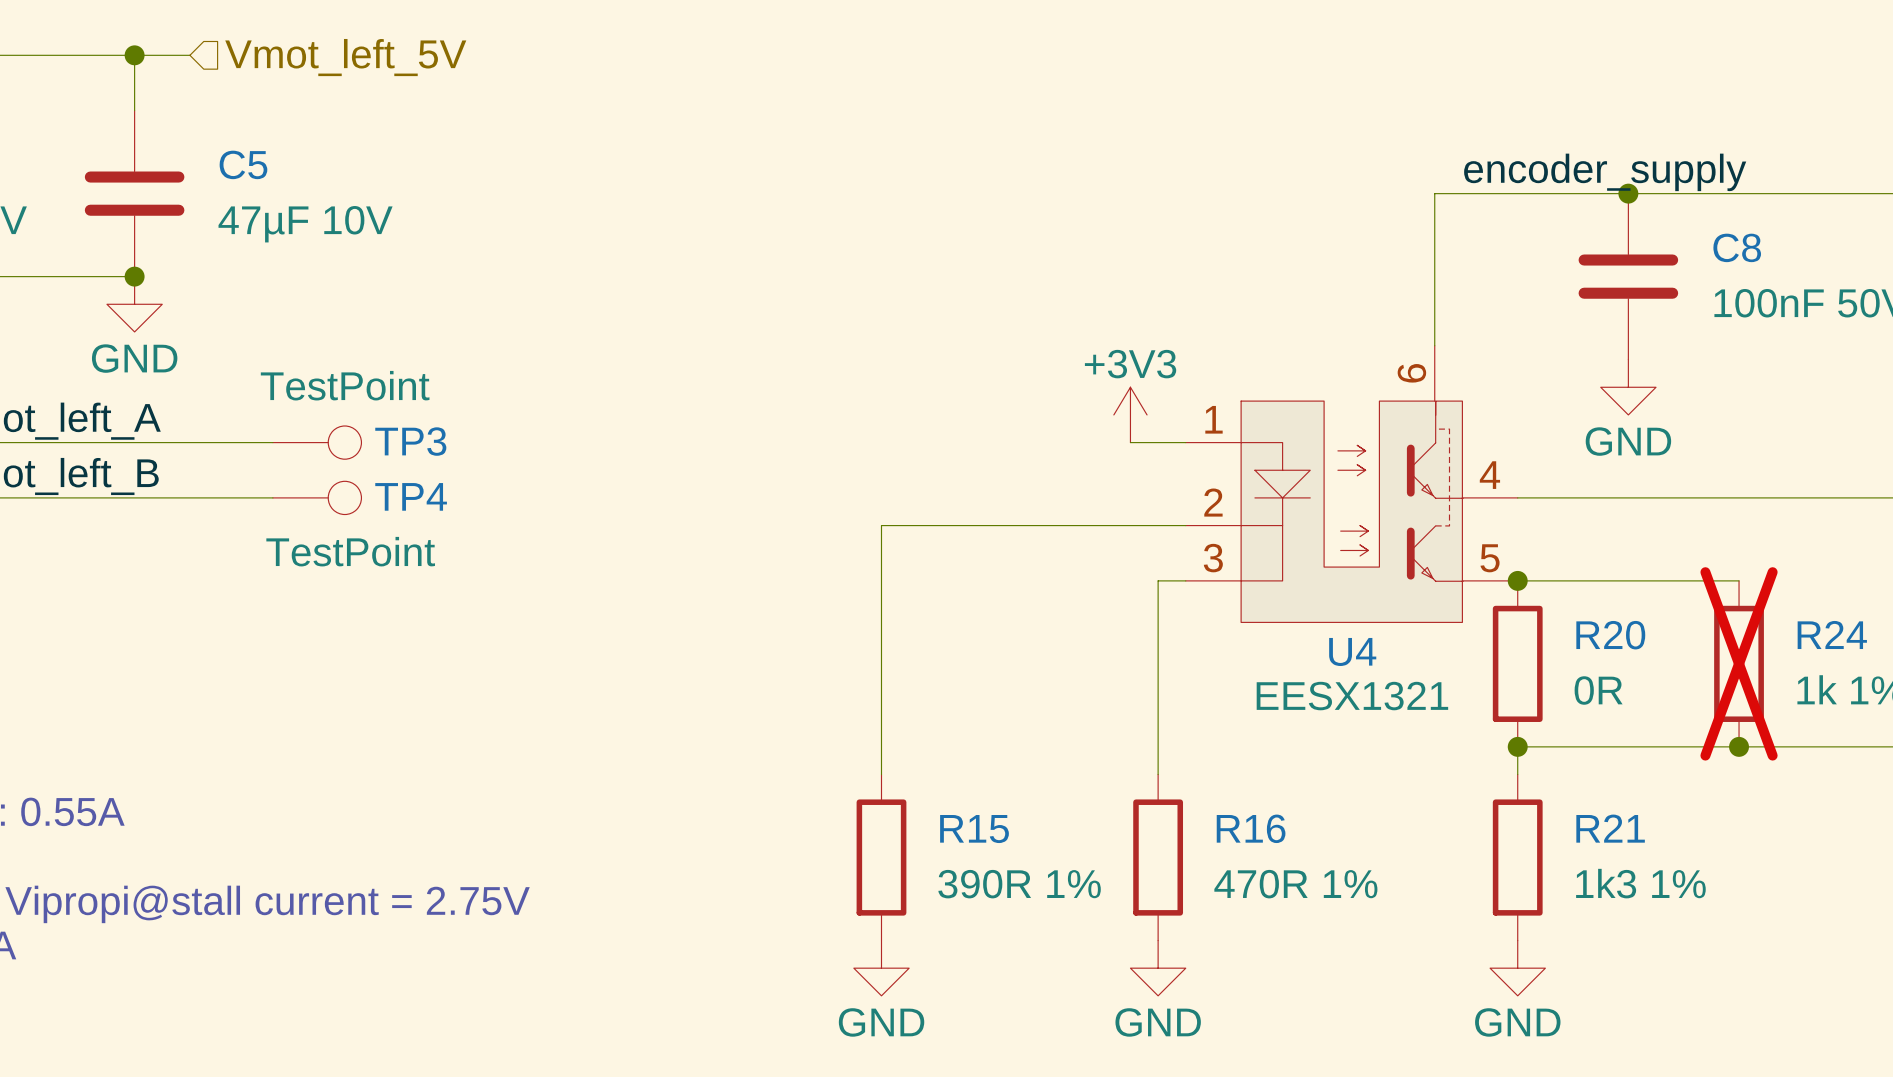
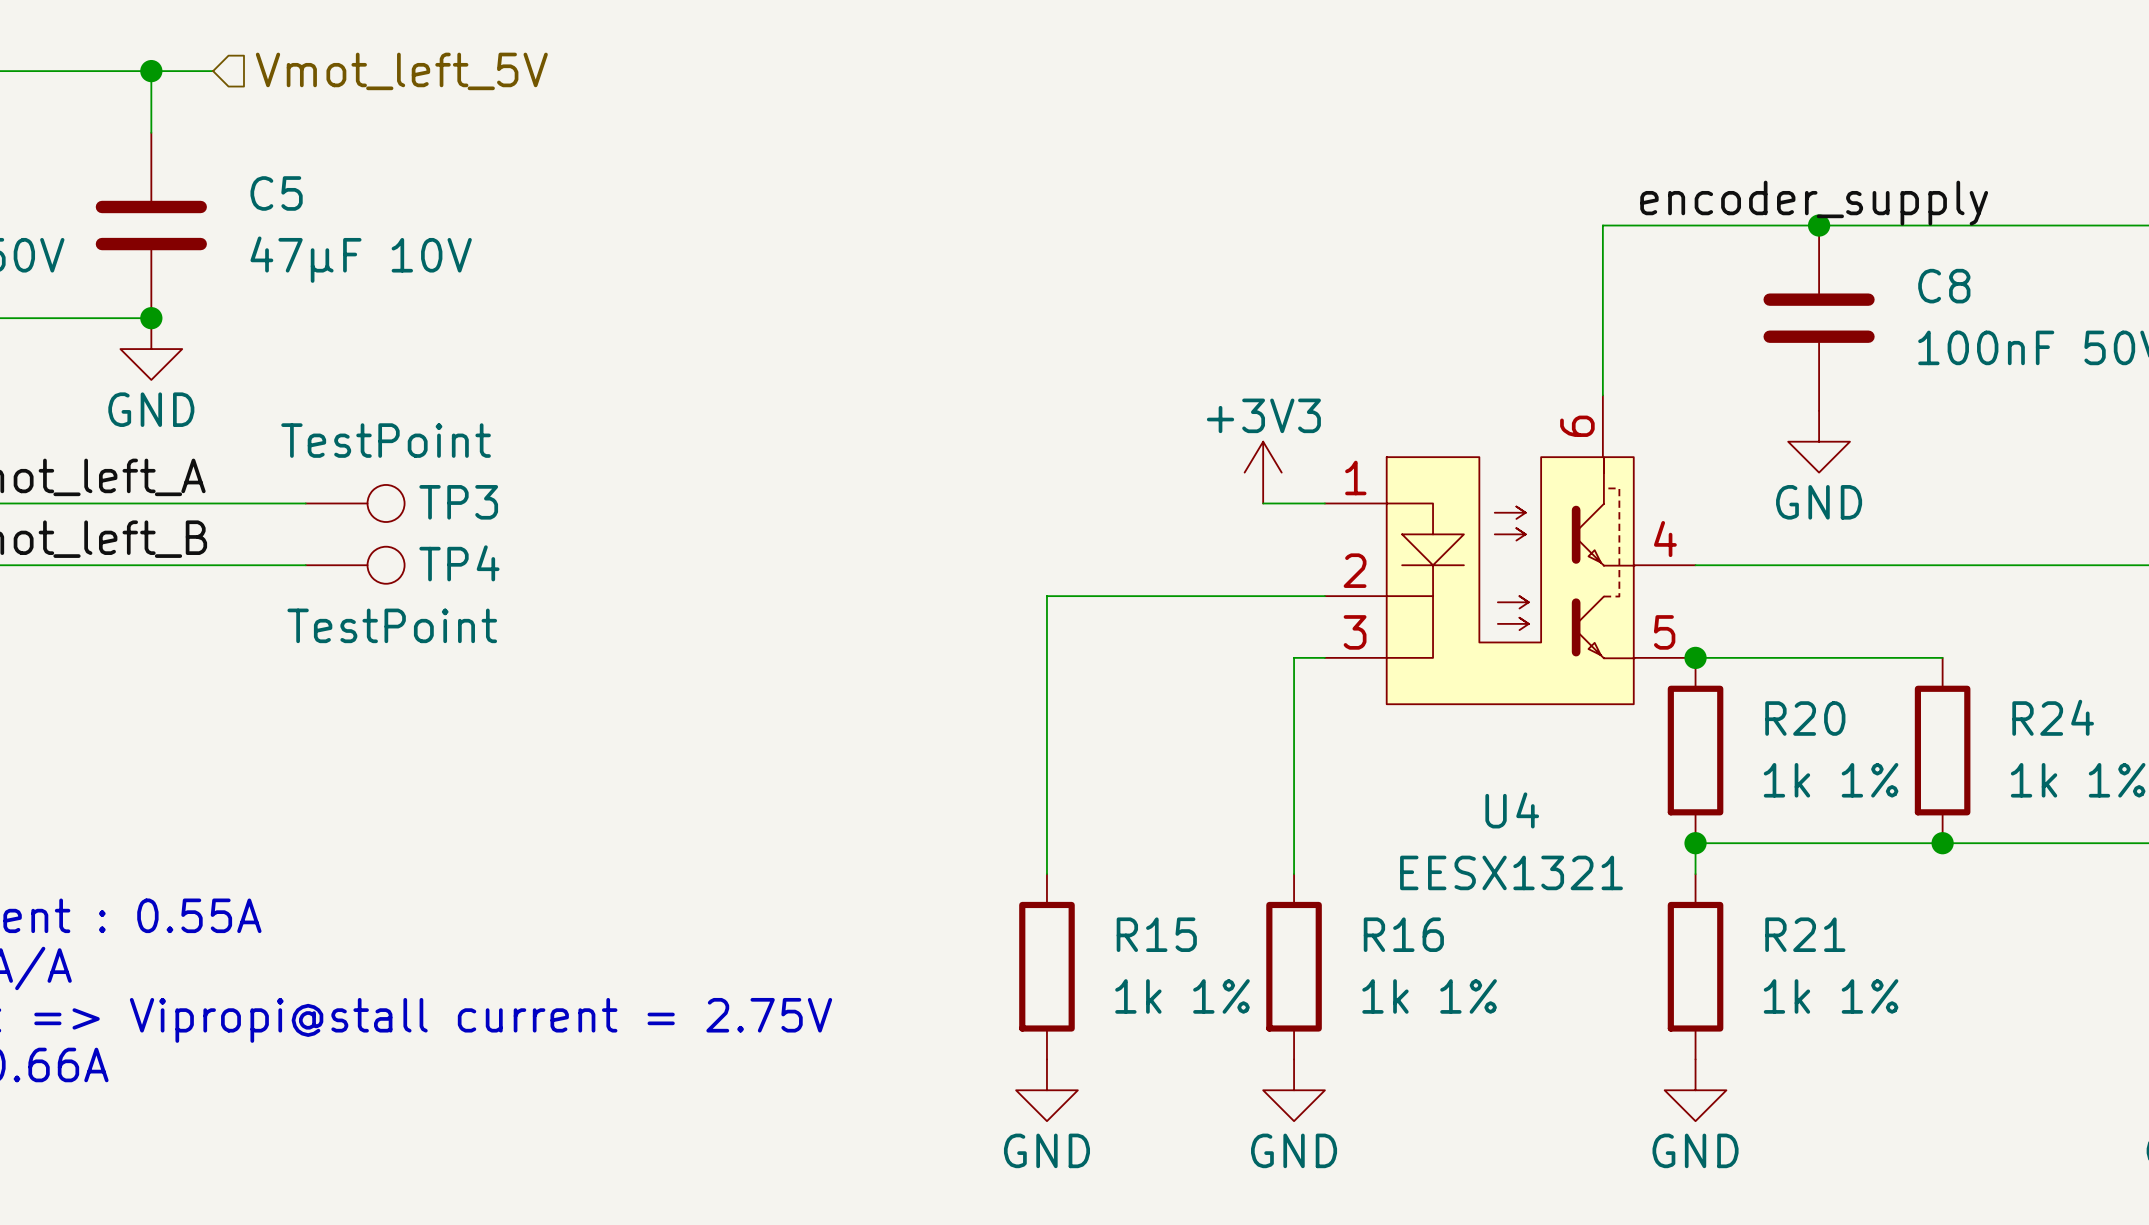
wire: (936, 525) (881, 525) (881, 774) -> (1046, 596) (1046, 874)
U4 name position: U4 (1352, 651) -> U4 (1512, 810)
R24 do-not-place cross: (1739, 663) -> none
R20 value: 0R (1598, 690) -> 1k 1% (1831, 780)
U4 value position: EESX1321 (1352, 696) -> EESX1321 (1511, 872)
R15 position: (881, 857) -> (1046, 966)
R21 value: 1k3 1% (1640, 883) -> 1k 1% (1831, 996)
R15 value: 390R 1% (1019, 884) -> 1k 1% (1182, 996)
R16 value: 470R 1% (1295, 884) -> 1k 1% (1429, 996)
power symbol position: GND (881, 968) -> GND (1046, 1090)

